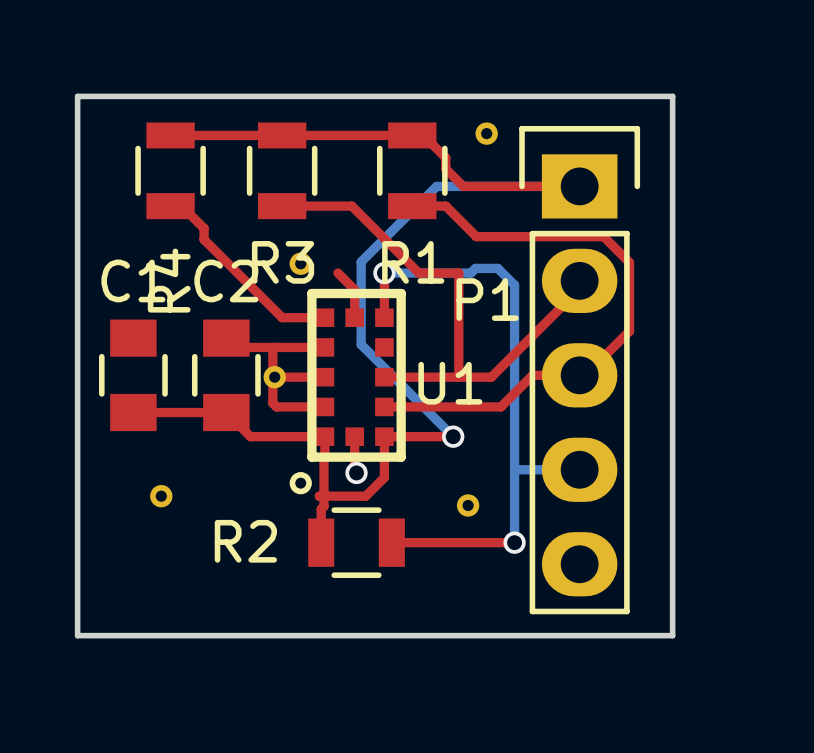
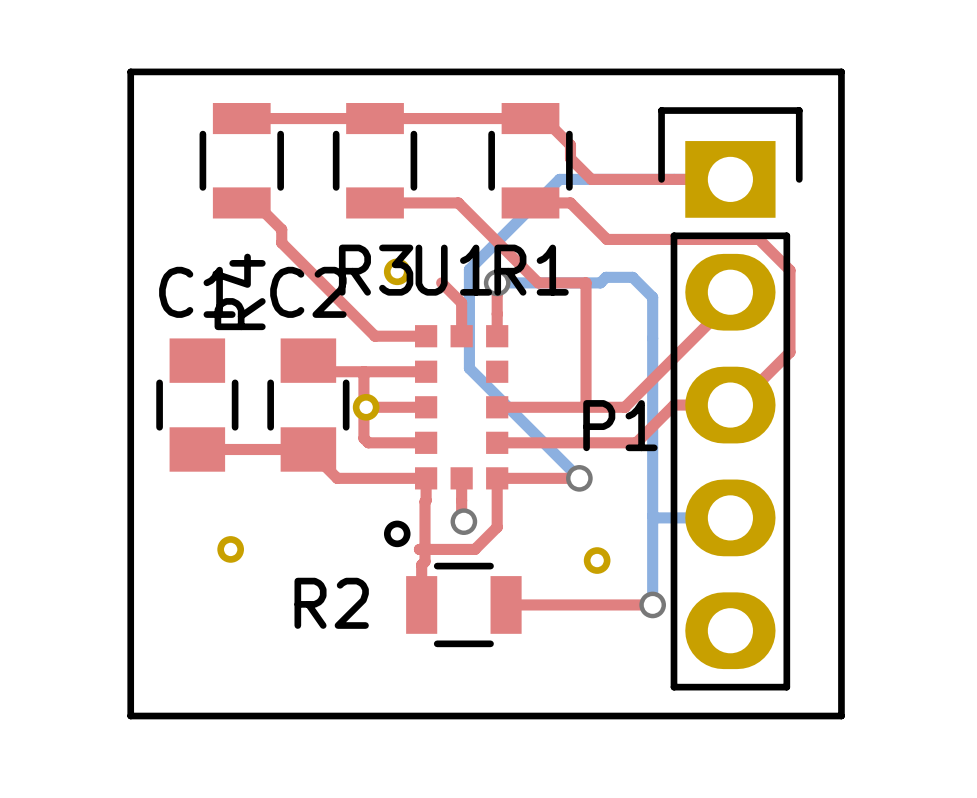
part: (486, 133) -> none
U1 footprint: [289, 288, 406, 495] -> [383, 325, 509, 548]
P1 name position: P1 (487, 299) -> P1 (620, 425)
U1 name position: U1 (450, 383) -> U1 (453, 270)

